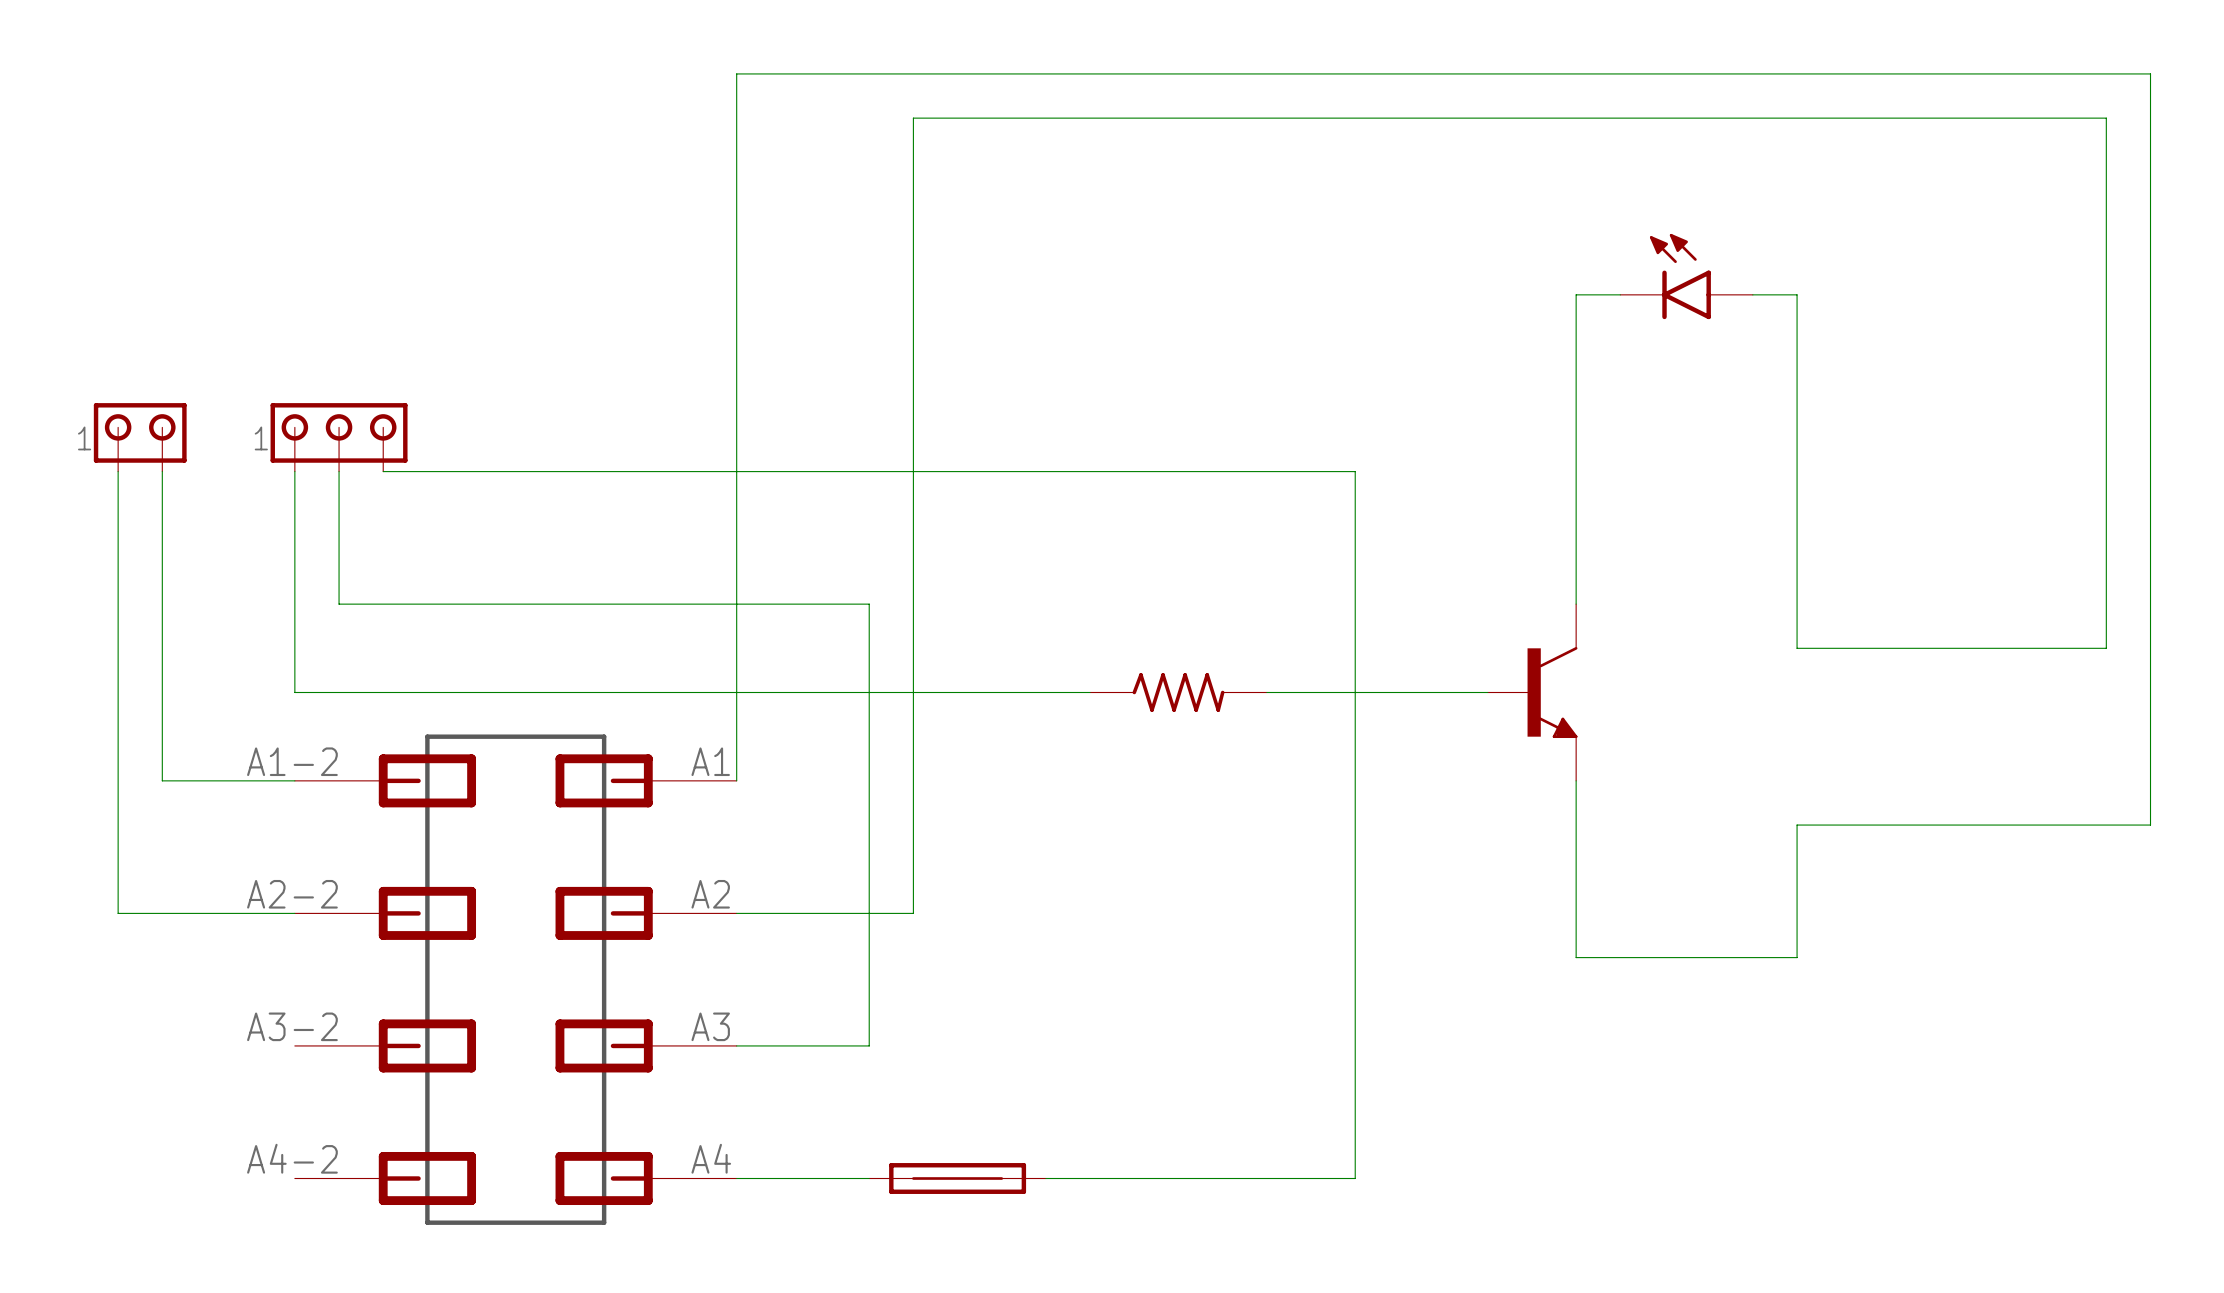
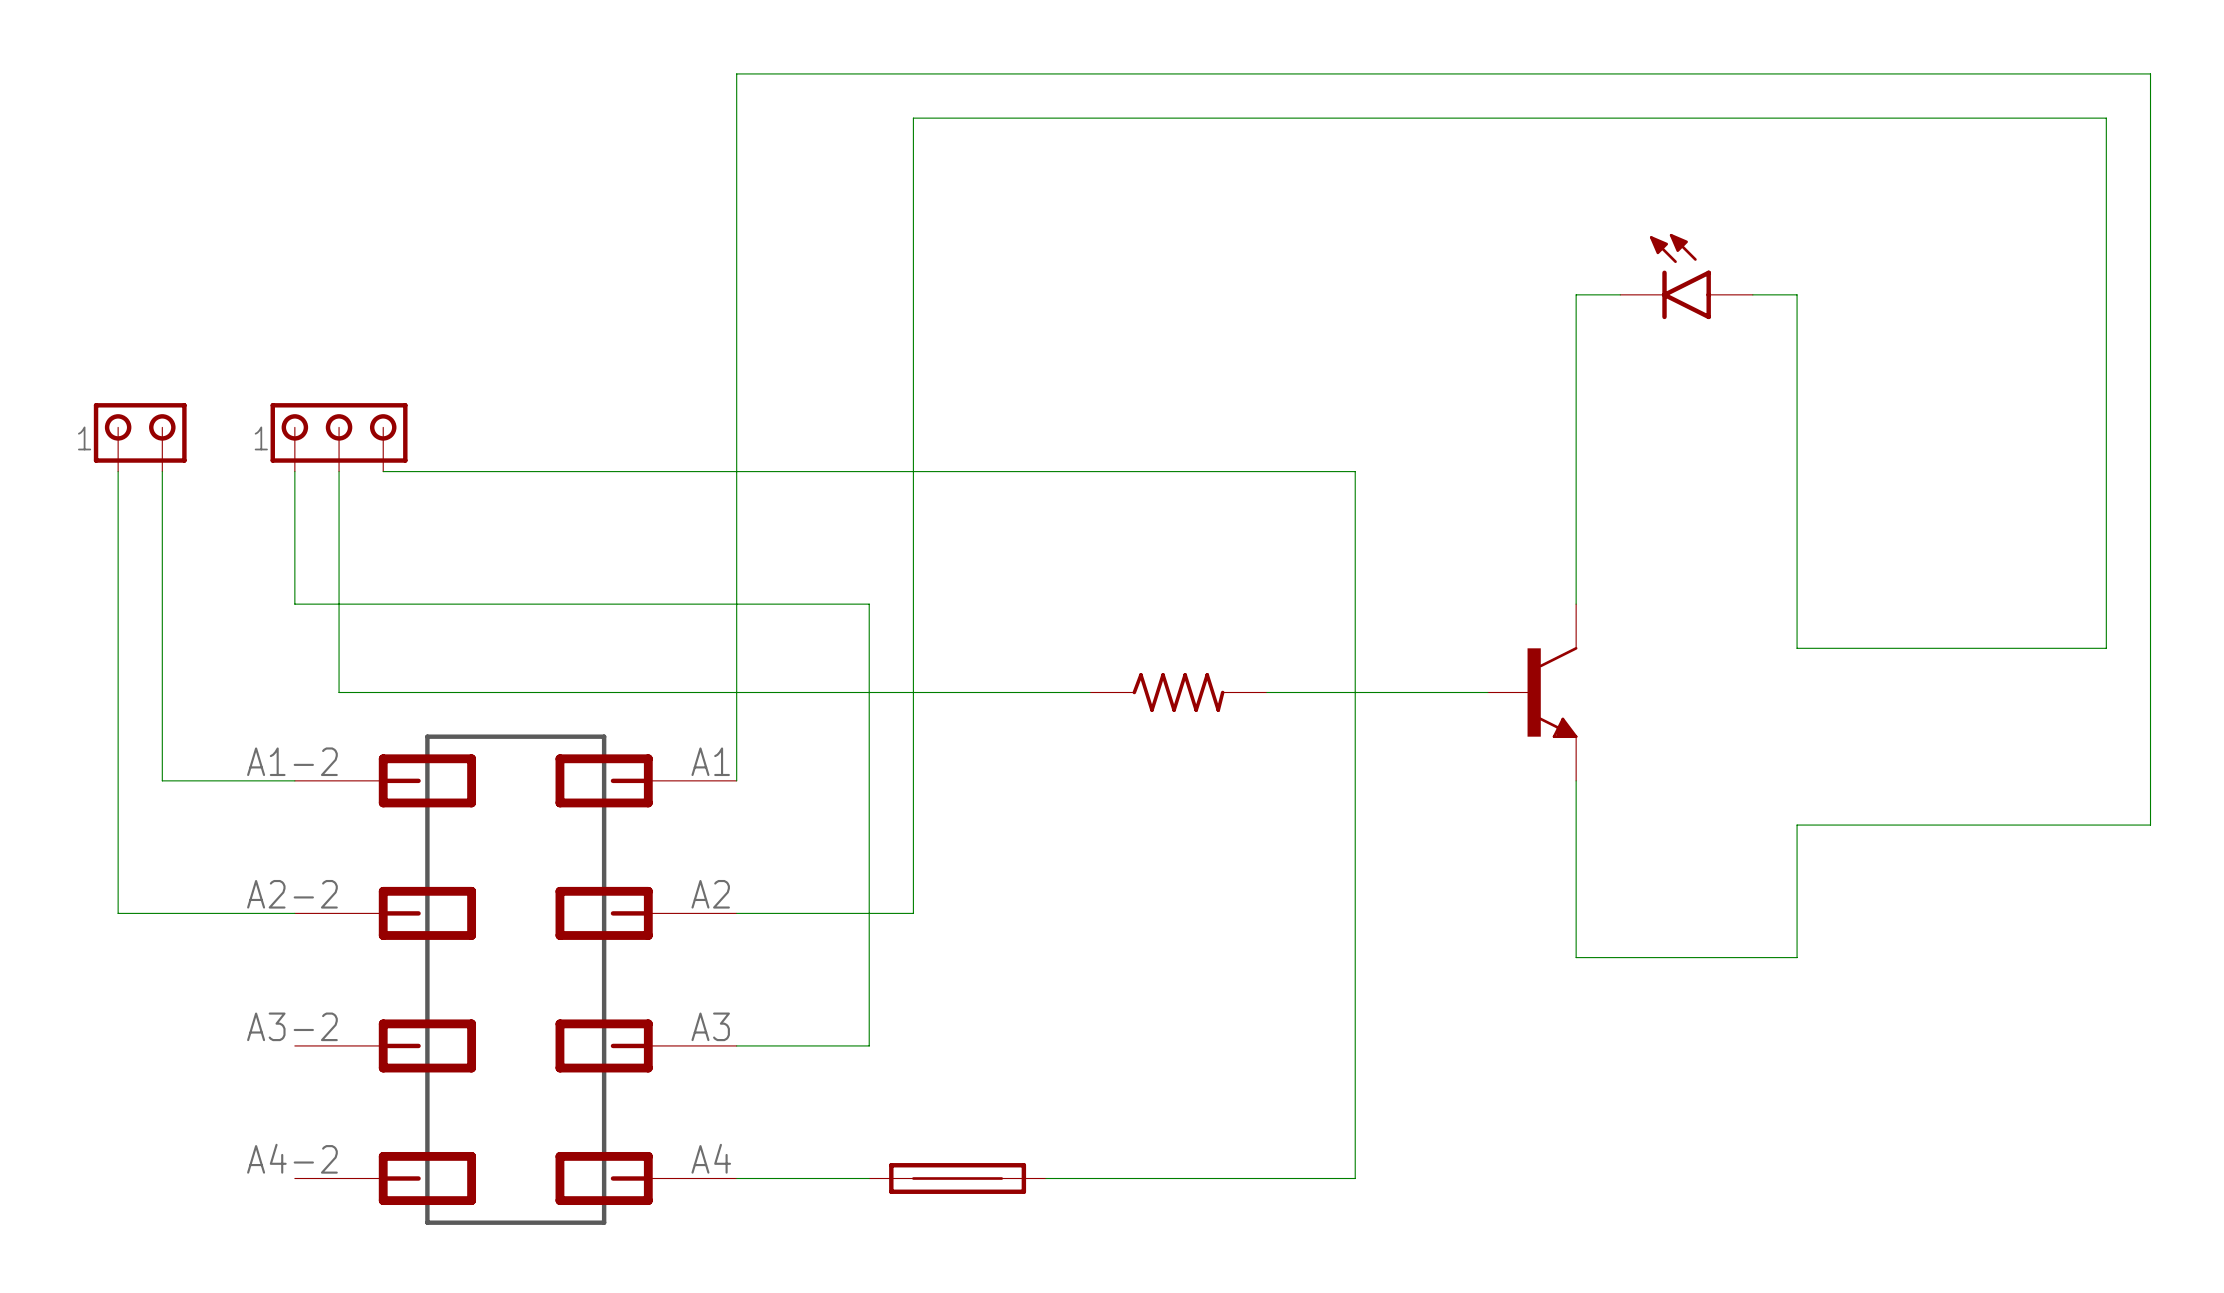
wire: (294, 604) (294, 692) (339, 692) -> (294, 604) (339, 604) (339, 692)

